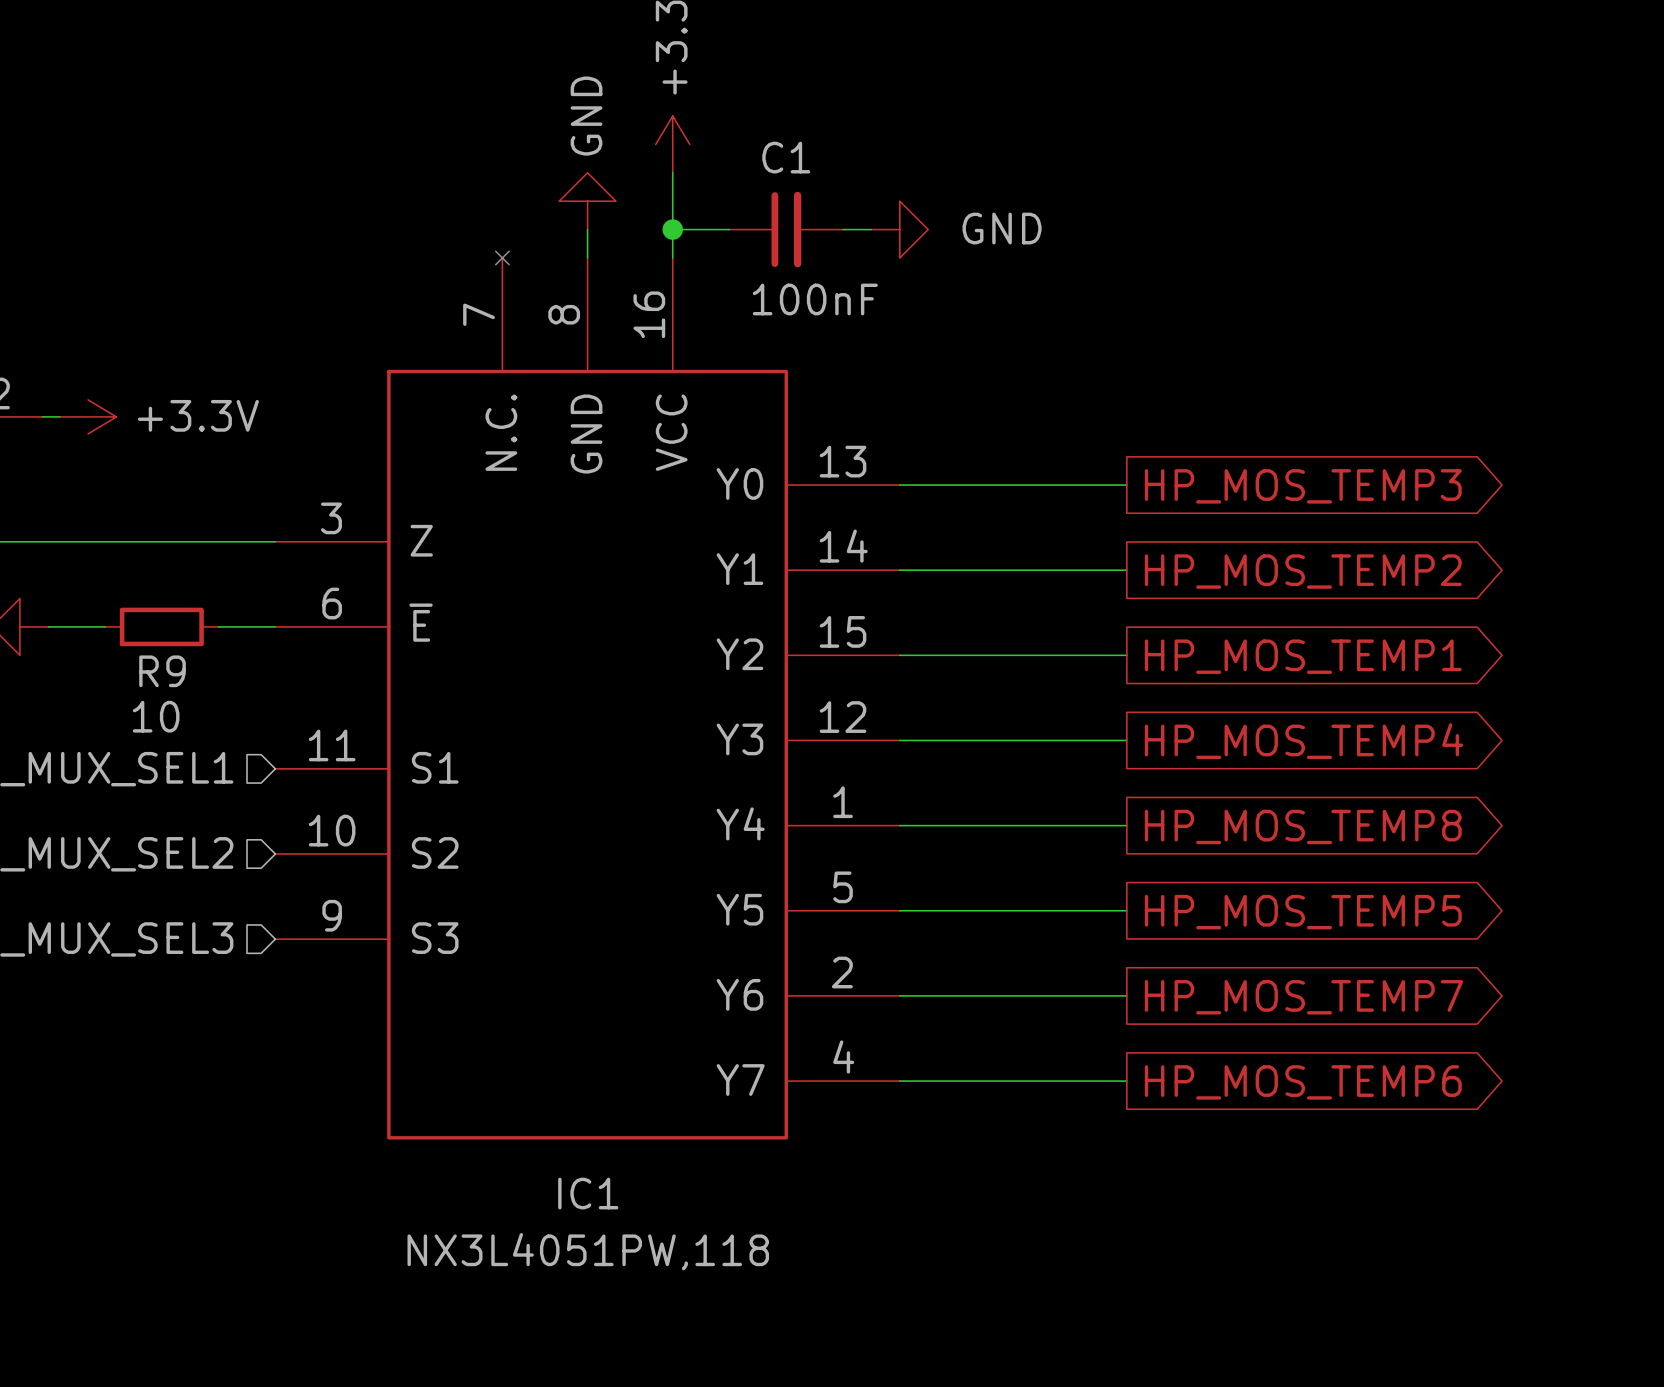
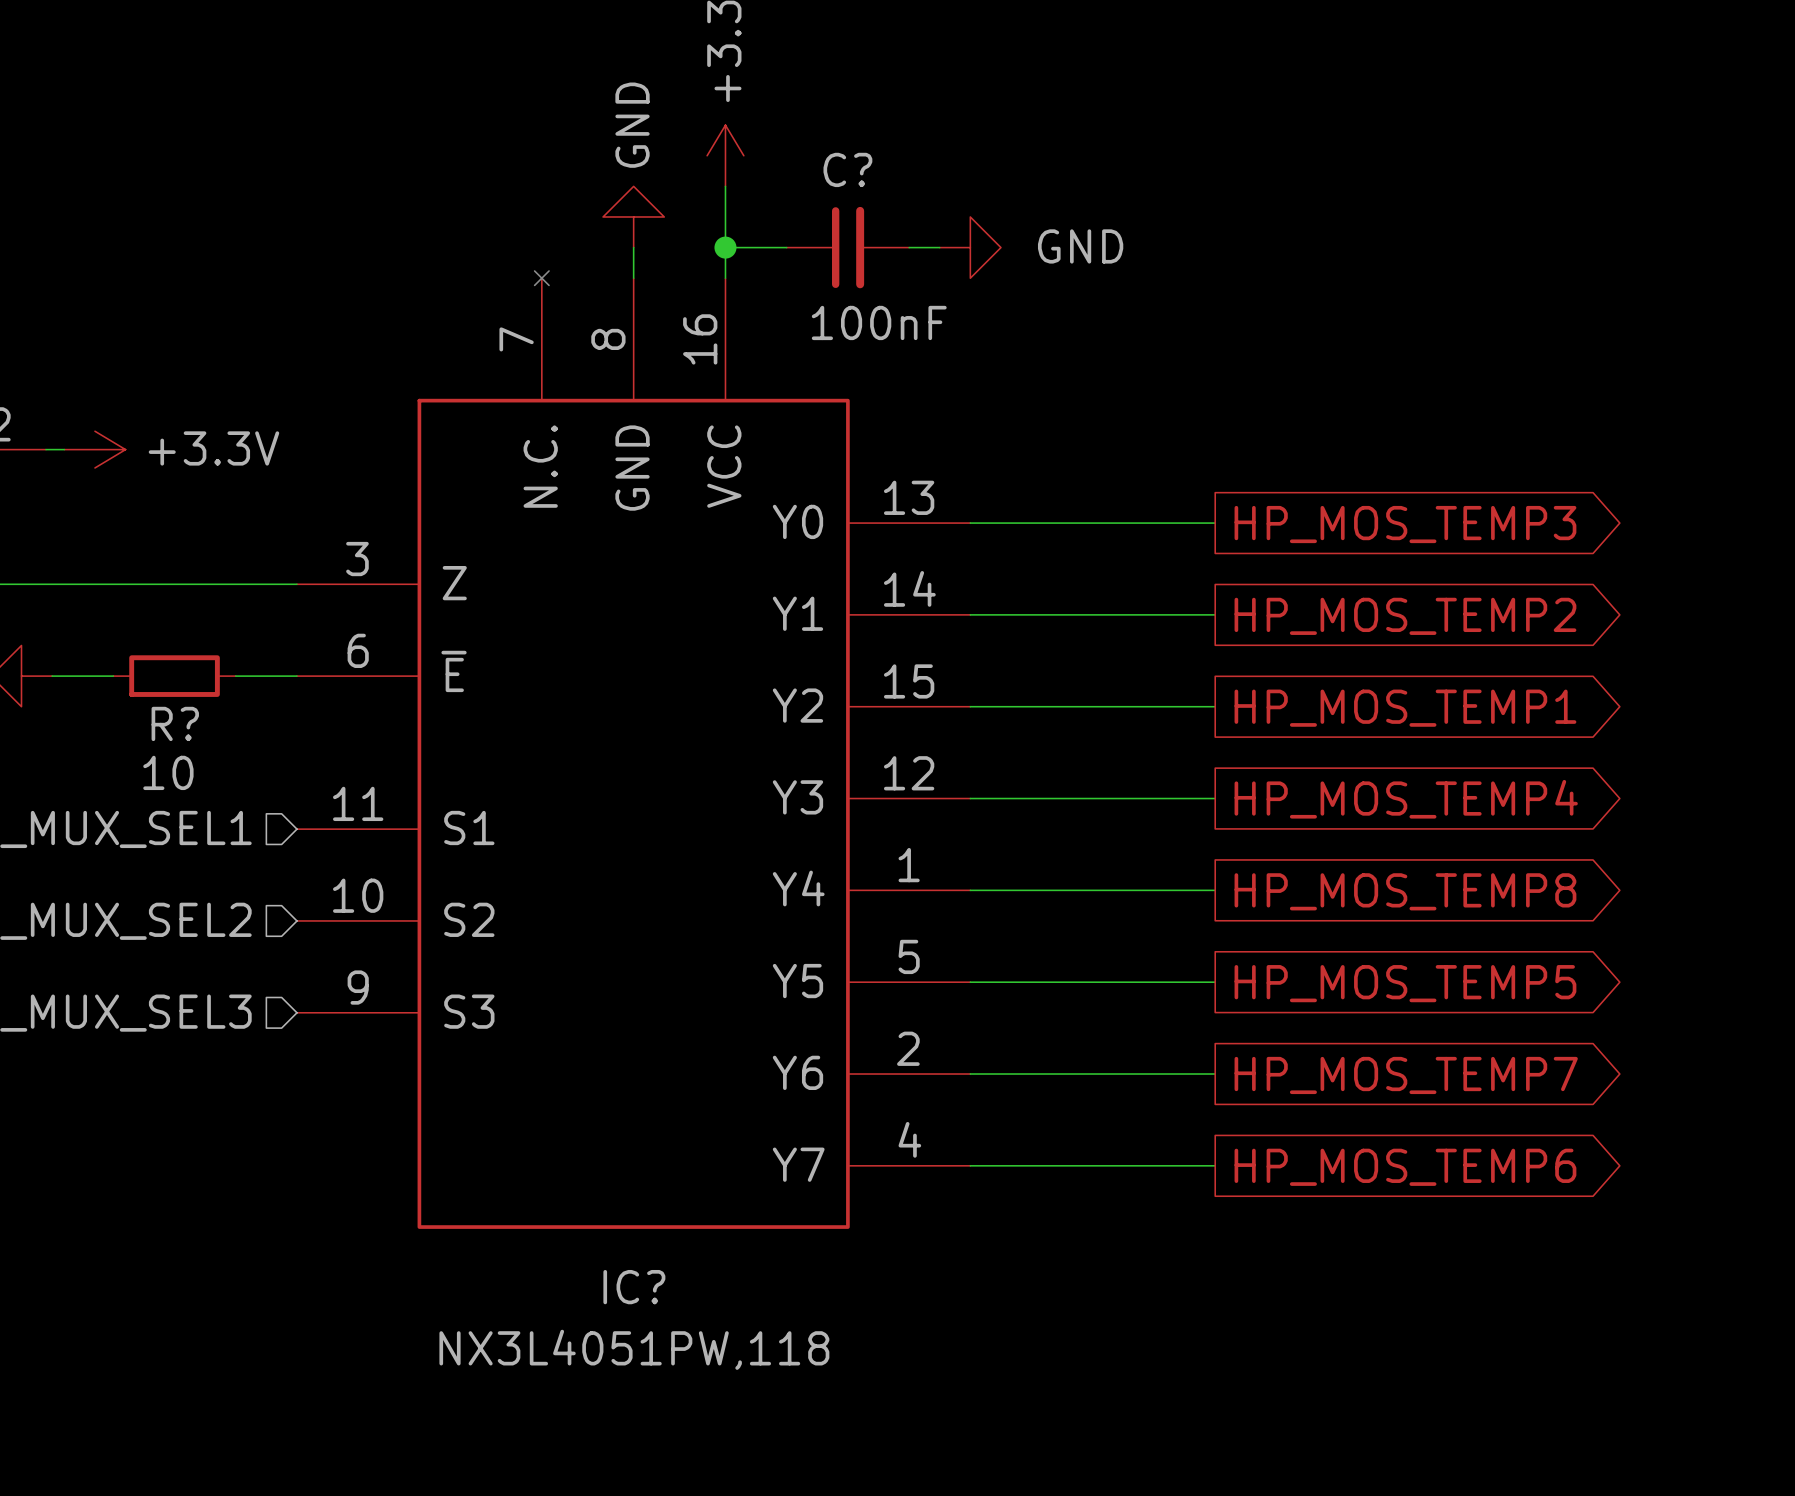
C1 name: C1 (786, 157) -> C? (847, 169)
R9 name: R9 (162, 671) -> R? (175, 723)
IC1 name: IC1 (588, 1193) -> IC? (634, 1287)

